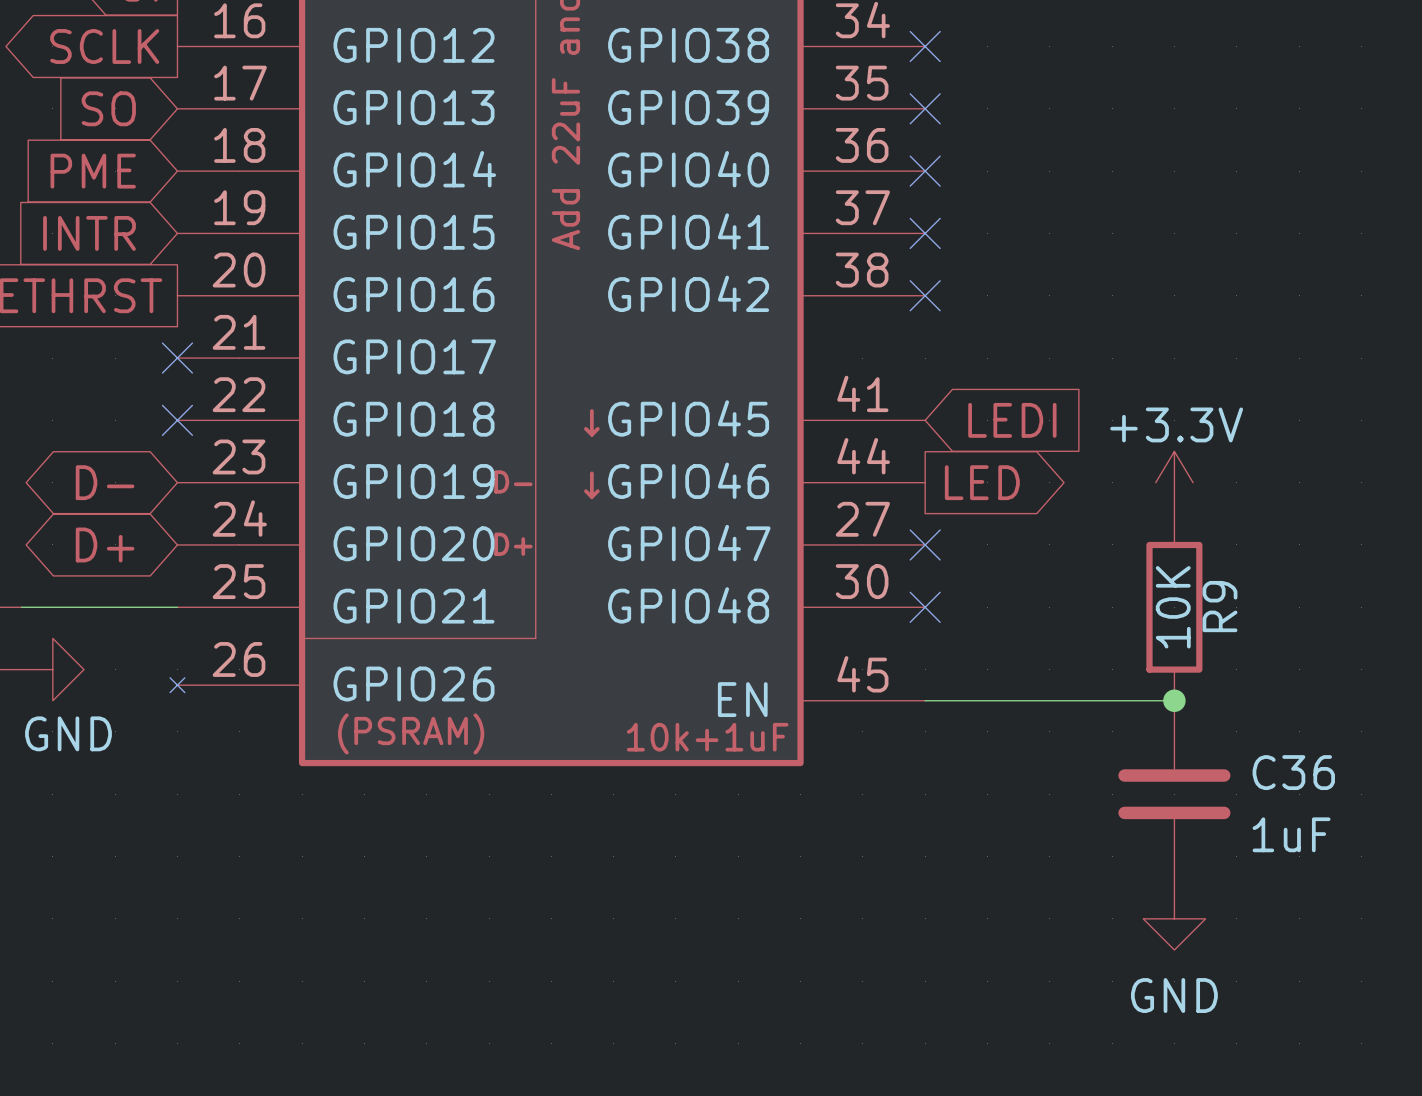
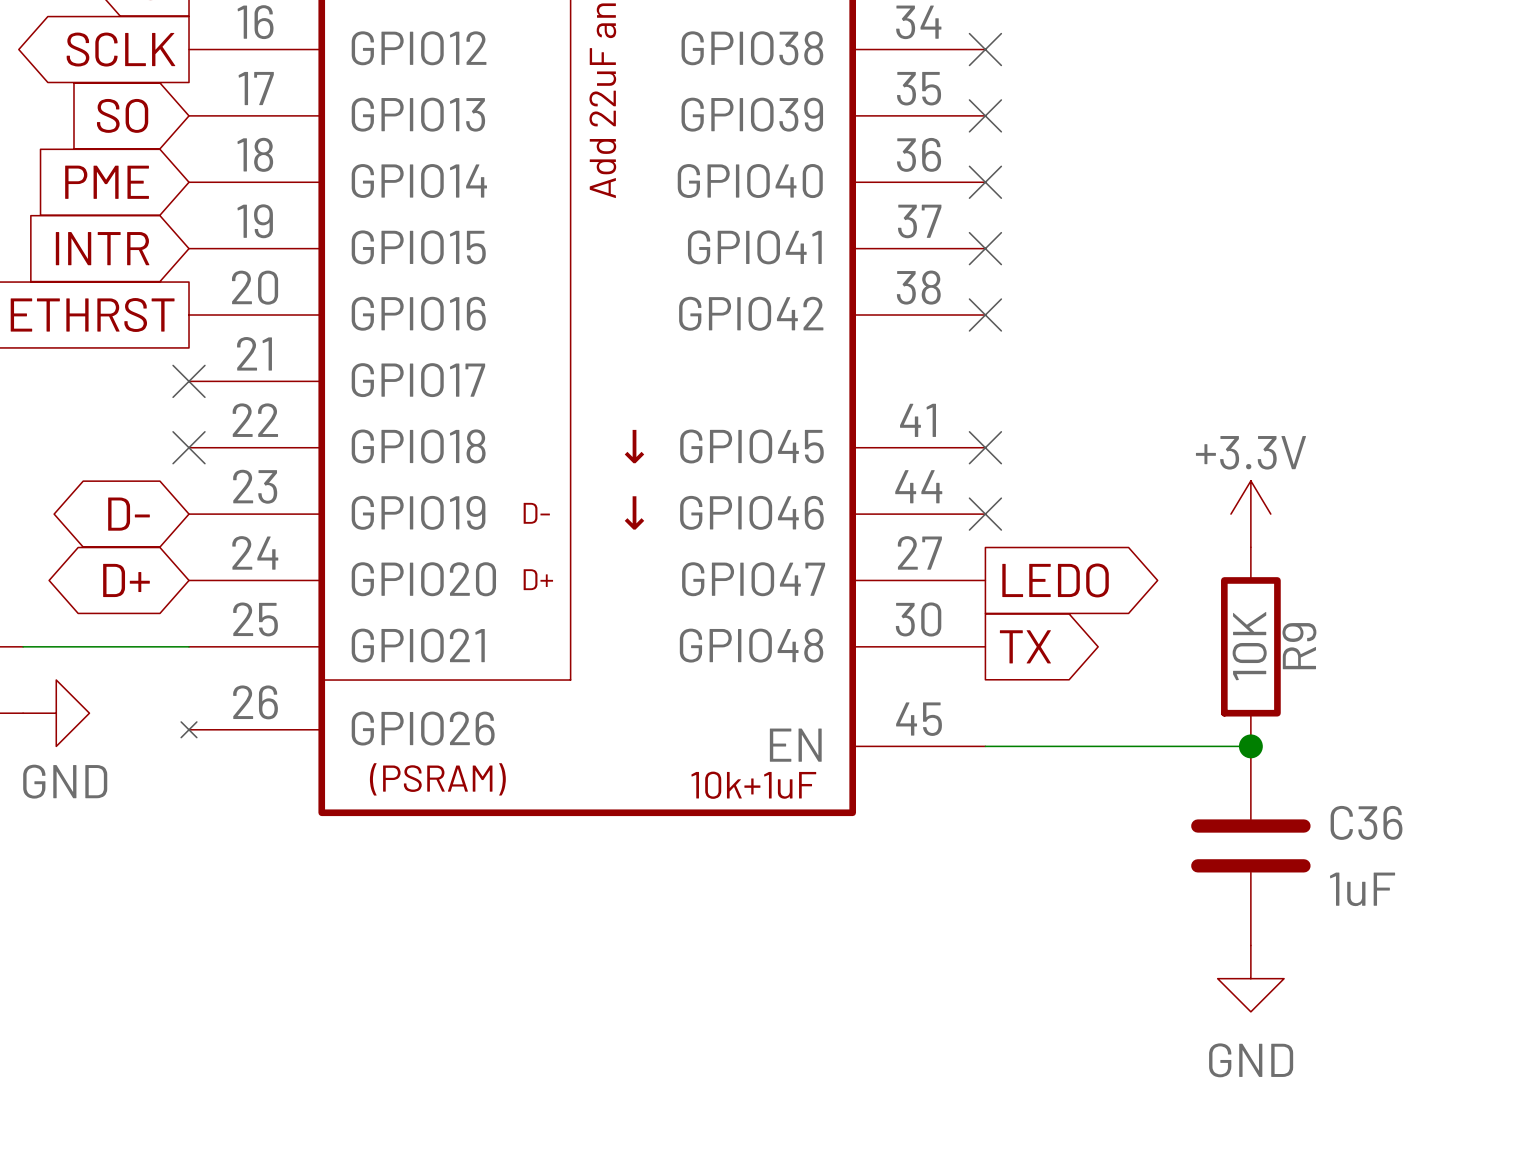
no-connect mark: none -> (985, 447)
global label: LEDI (1012, 420) -> none
no-connect mark: none -> (985, 514)
global label: LED (982, 482) -> LEDO (1055, 580)
no-connect mark: (925, 544) -> none
no-connect mark: (925, 607) -> none
global label: none -> TX (1025, 646)

